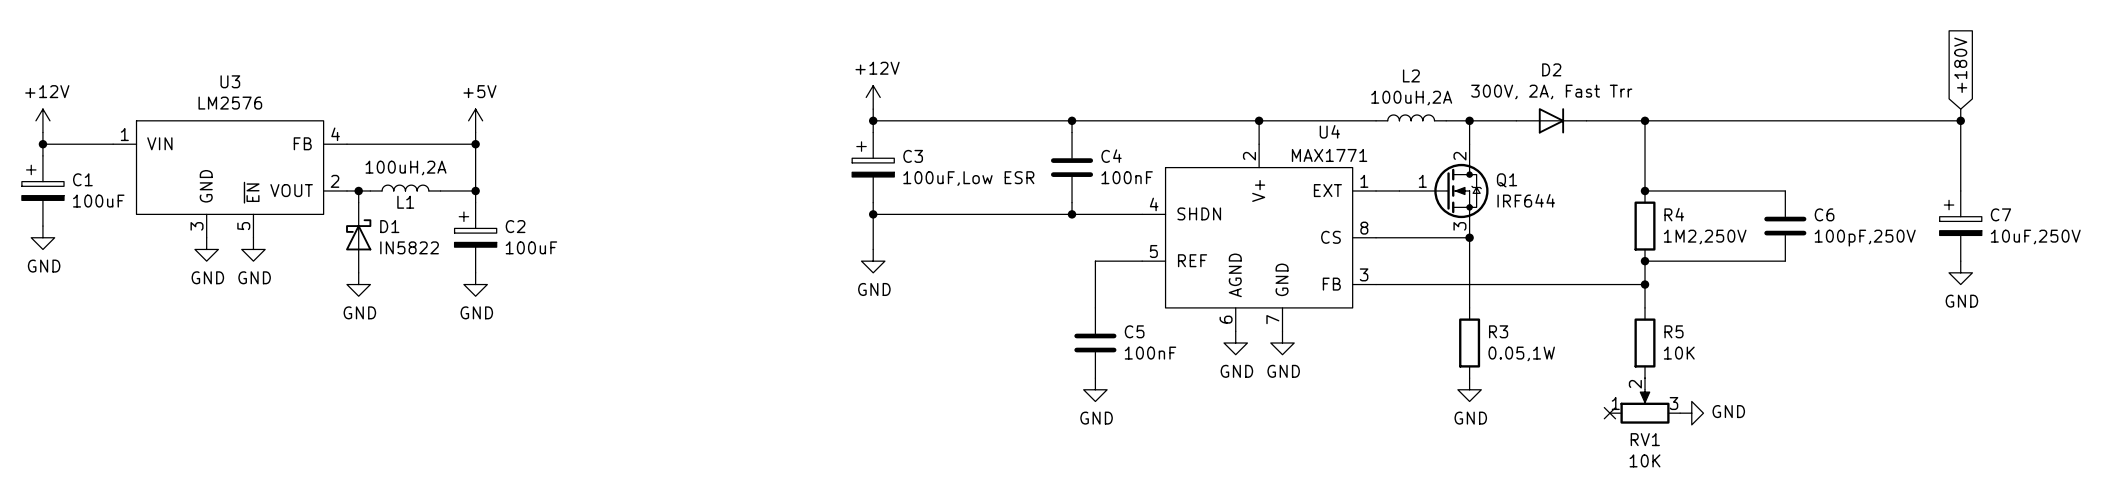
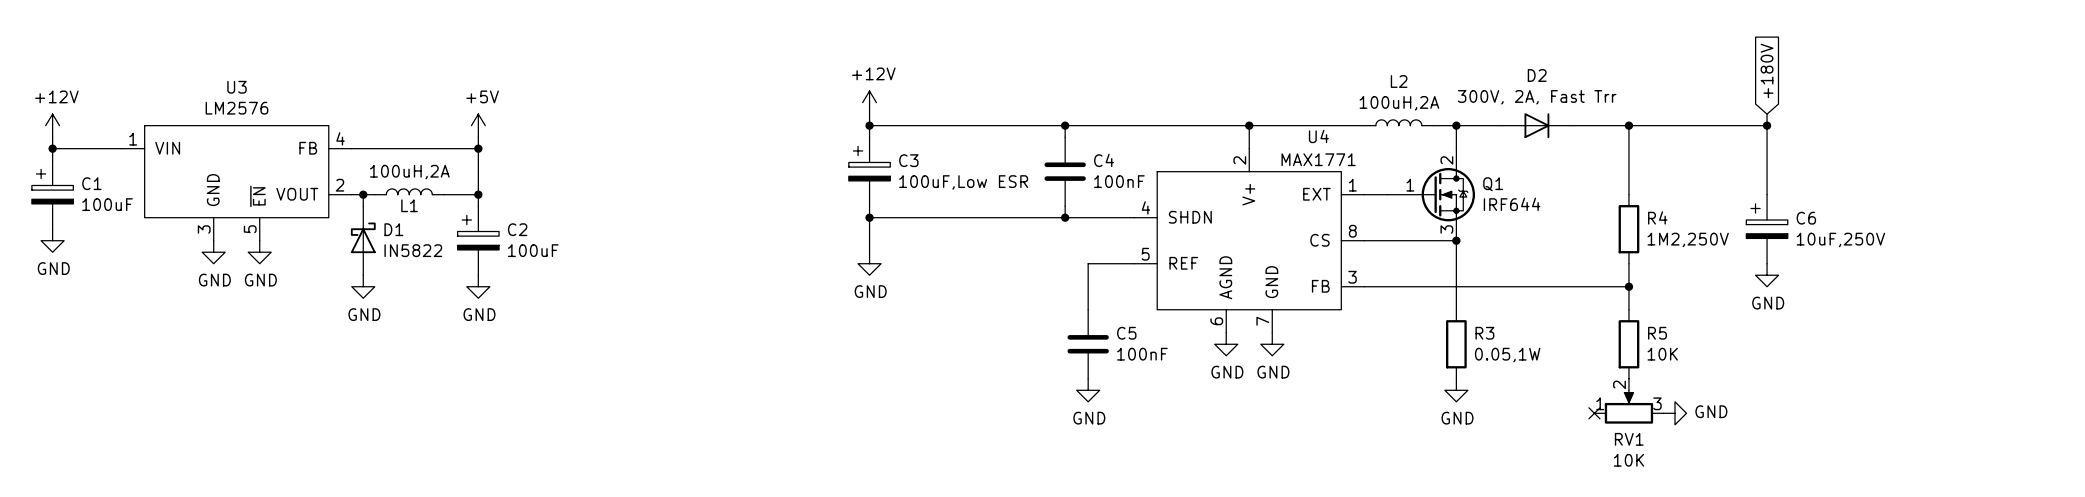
global label position: +180V (1960, 65) -> +180V (1767, 70)
wire: (1960, 109) (1960, 190) -> none
wire: (1785, 120) (1960, 120) -> none
junction: none -> (1767, 125)
junction: (1960, 120) -> none
wire: (1645, 190) (1785, 190) -> (1767, 114) (1767, 194)
junction: (1645, 190) -> none
C6 symbol: [1764, 190, 1807, 262] -> [1746, 194, 1788, 264]
C7: 10uF,250V (1960, 226) -> none
C6 value: 100pF,250V (1865, 238) -> 10uF,250V (1840, 239)
wire: (1645, 261) (1785, 261) -> none
junction: (1645, 261) -> none
power symbol position: GND (1960, 272) -> GND (1767, 275)

